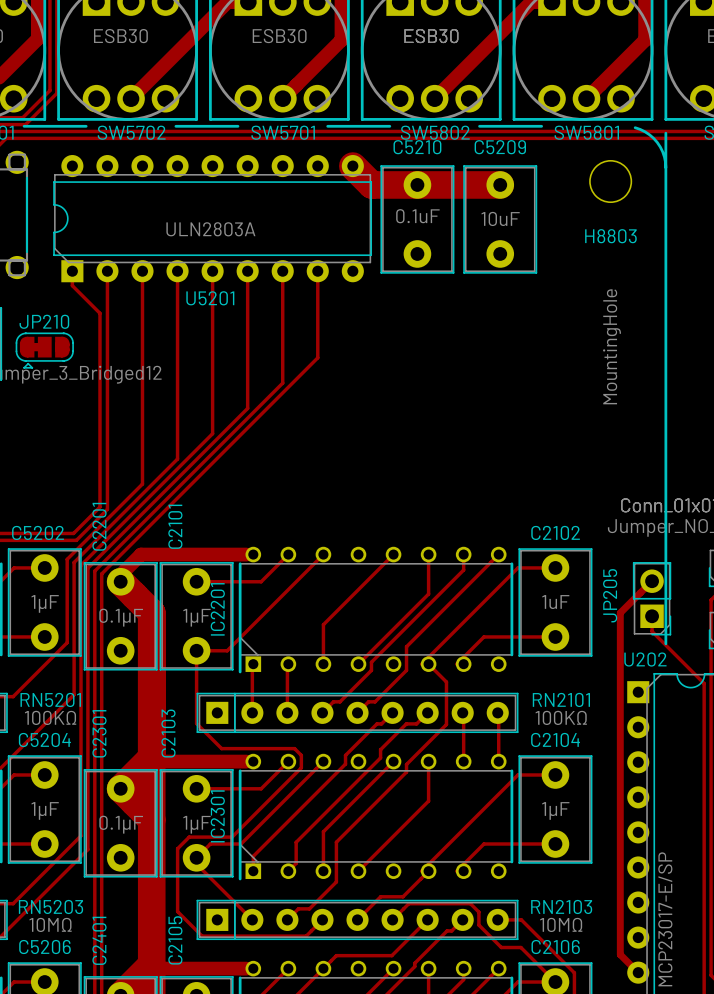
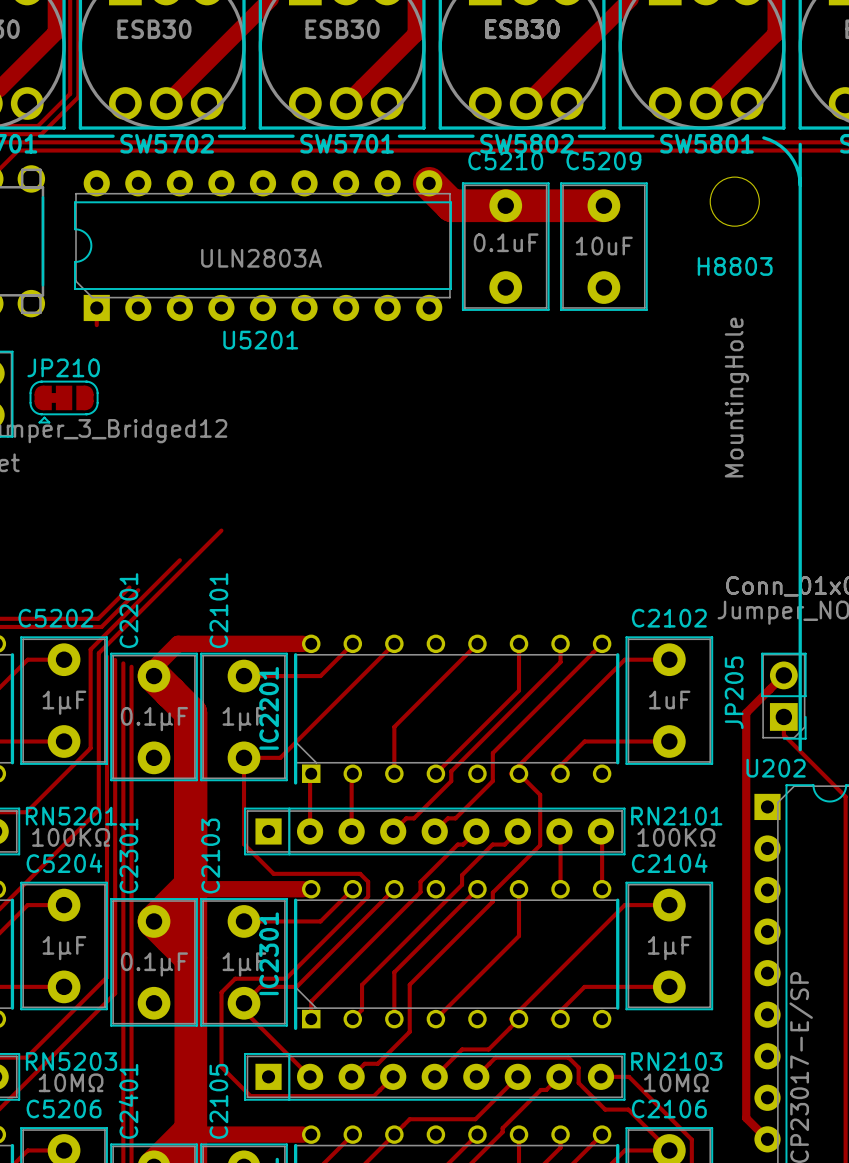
track: (107, 271) (107, 509) -> none
track: (142, 271) (142, 484) -> none
track: (177, 271) (177, 459) -> none
track: (212, 271) (212, 433) (81, 565) -> none
track: (247, 271) (247, 408) (87, 568) -> none
track: (282, 271) (282, 383) (94, 571) -> none
track: (317, 271) (317, 357) (101, 573) -> none
track: (72, 285) (99, 313) (99, 507) -> none

